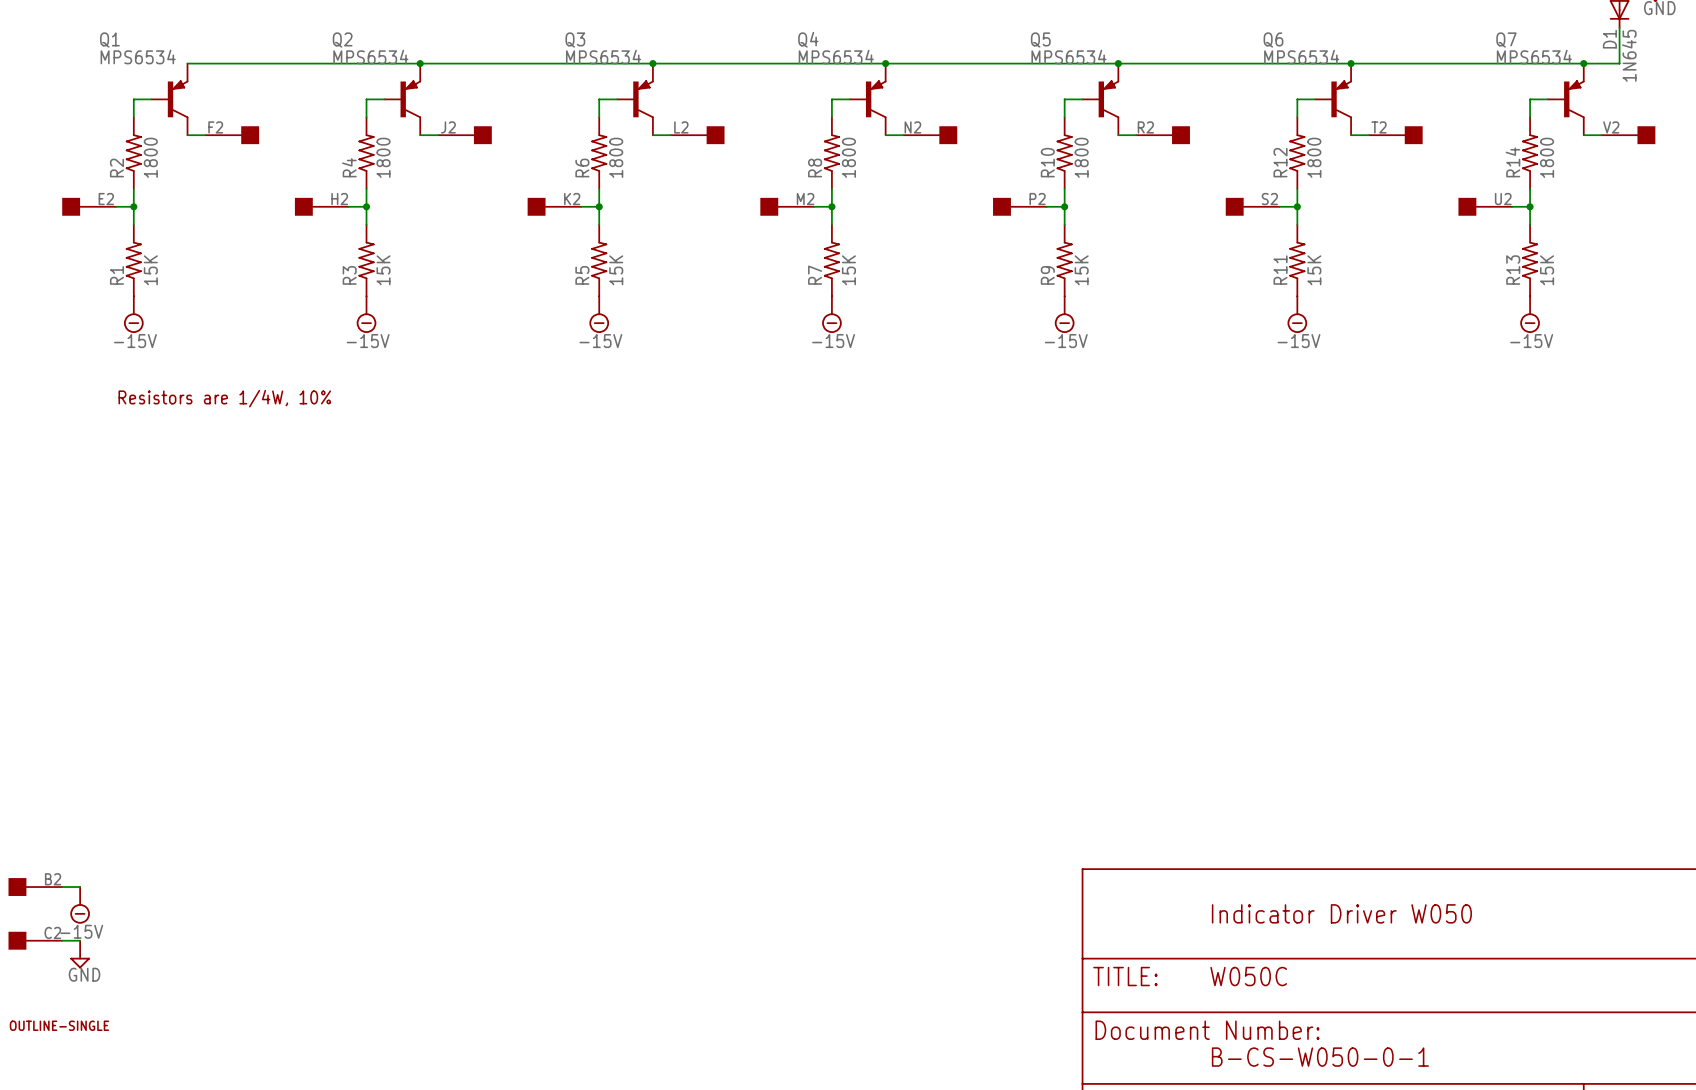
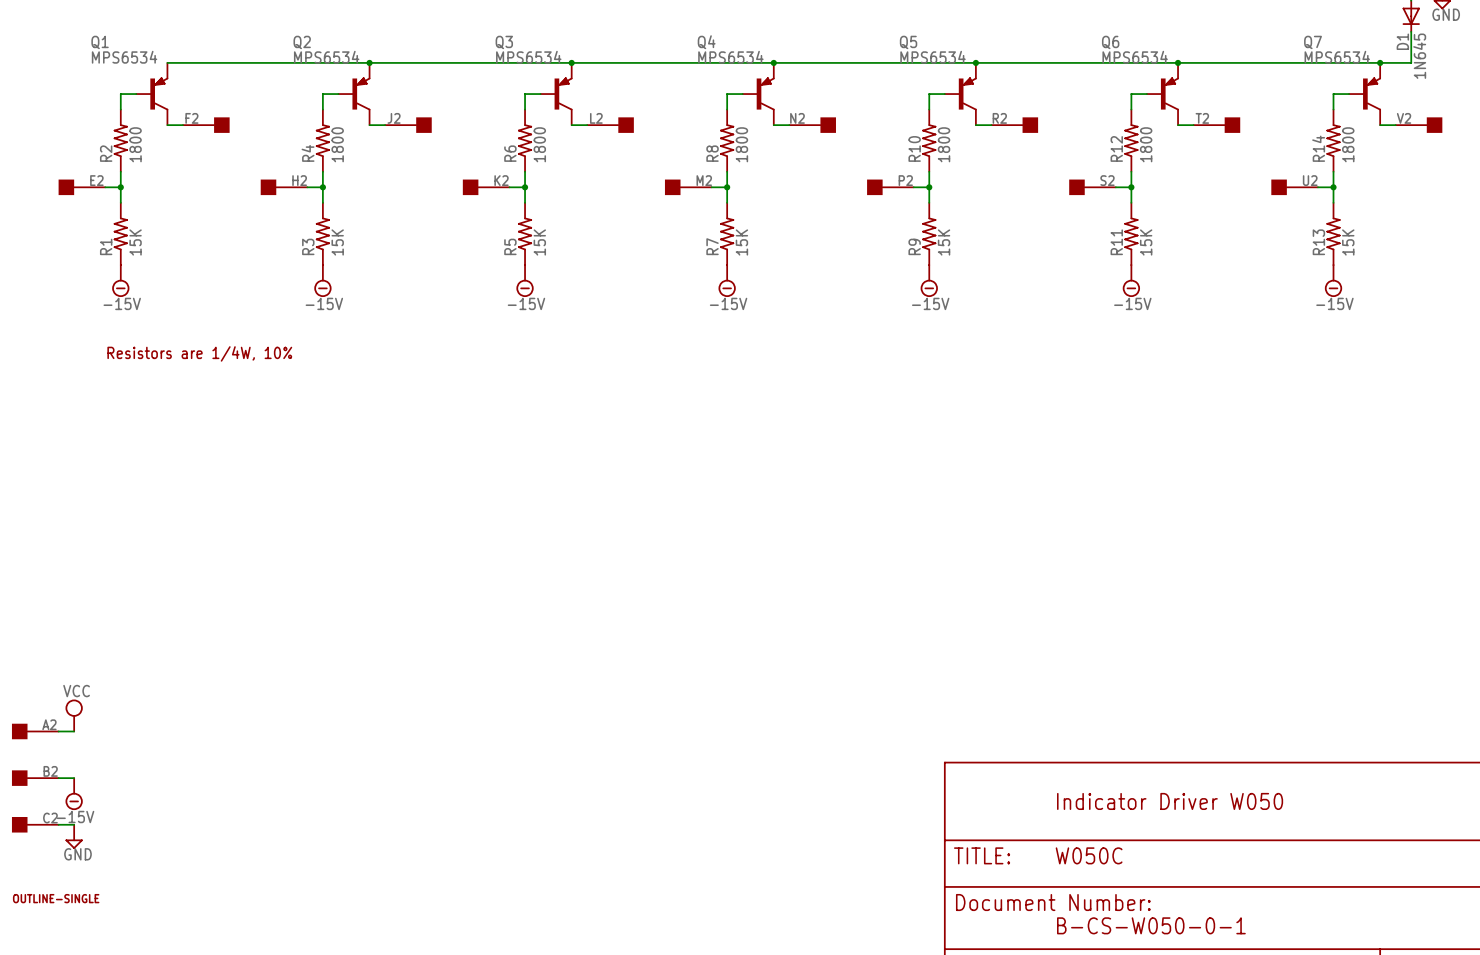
power symbol: none -> VCC (74, 715)
part: none -> (35, 731)
wire: none -> (58, 731) (74, 731)

